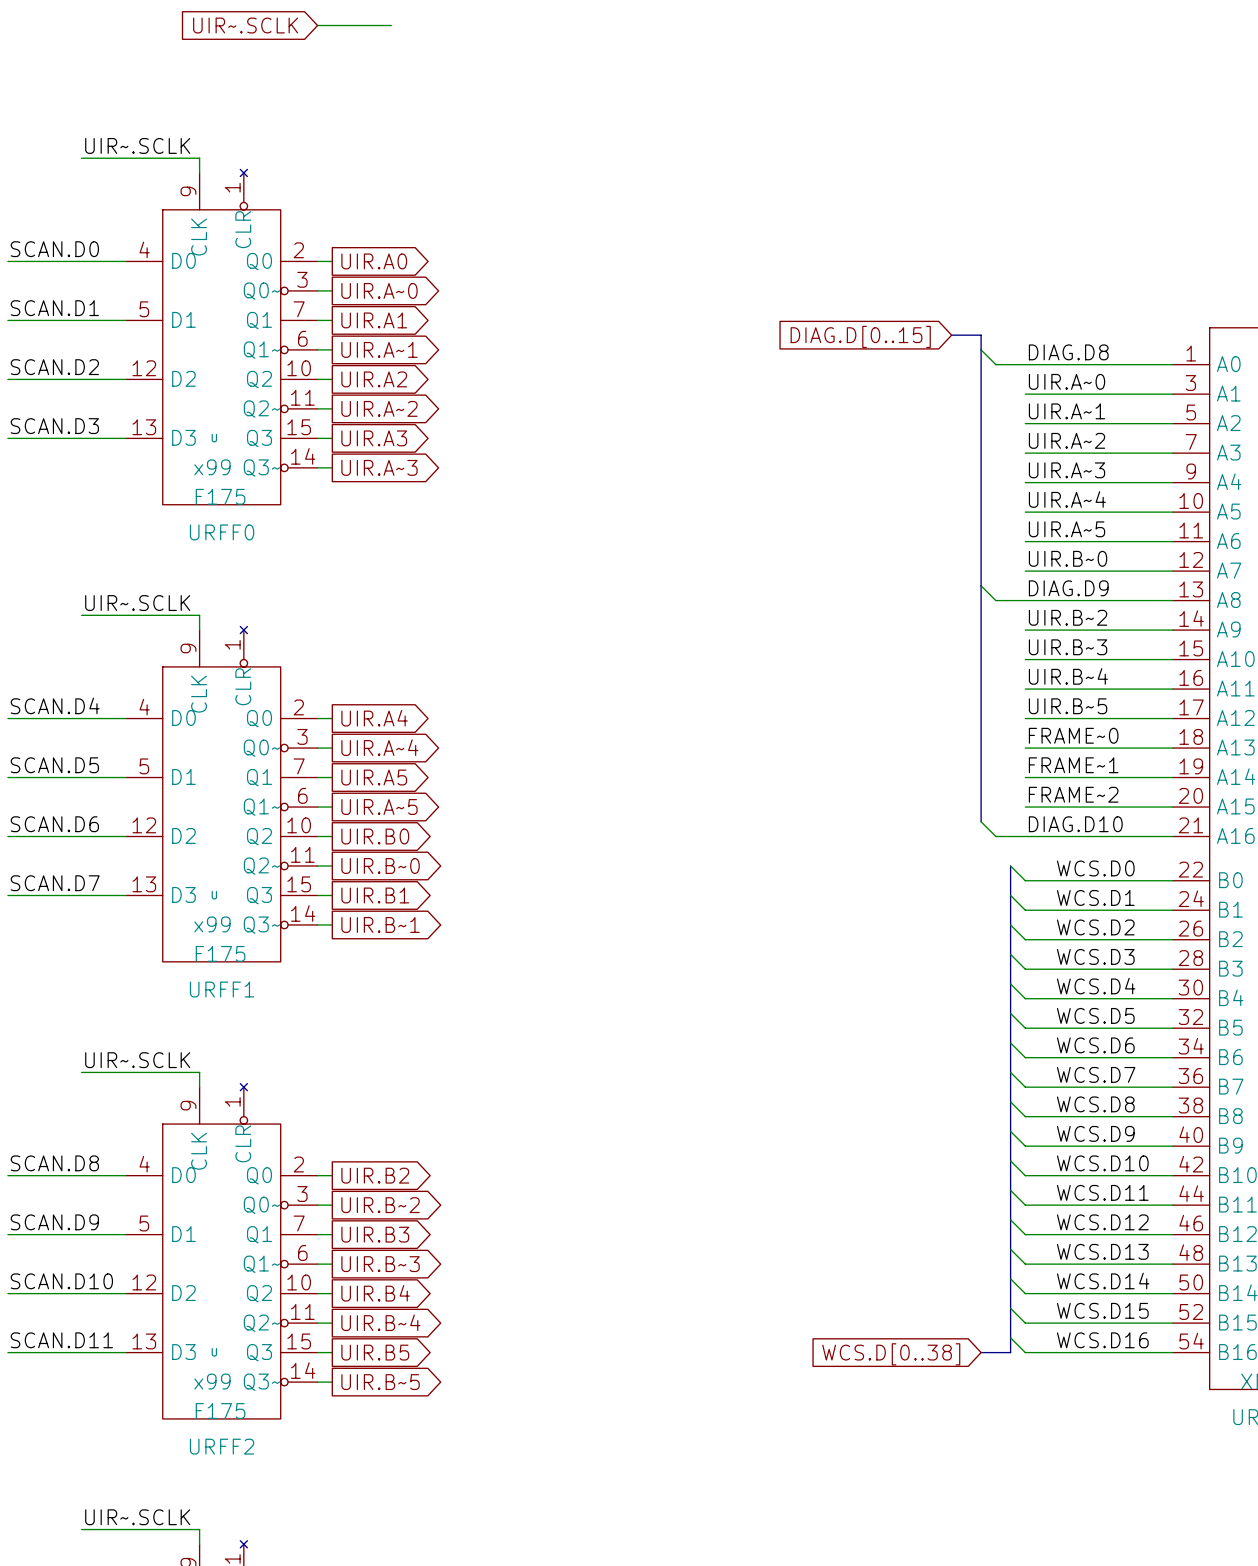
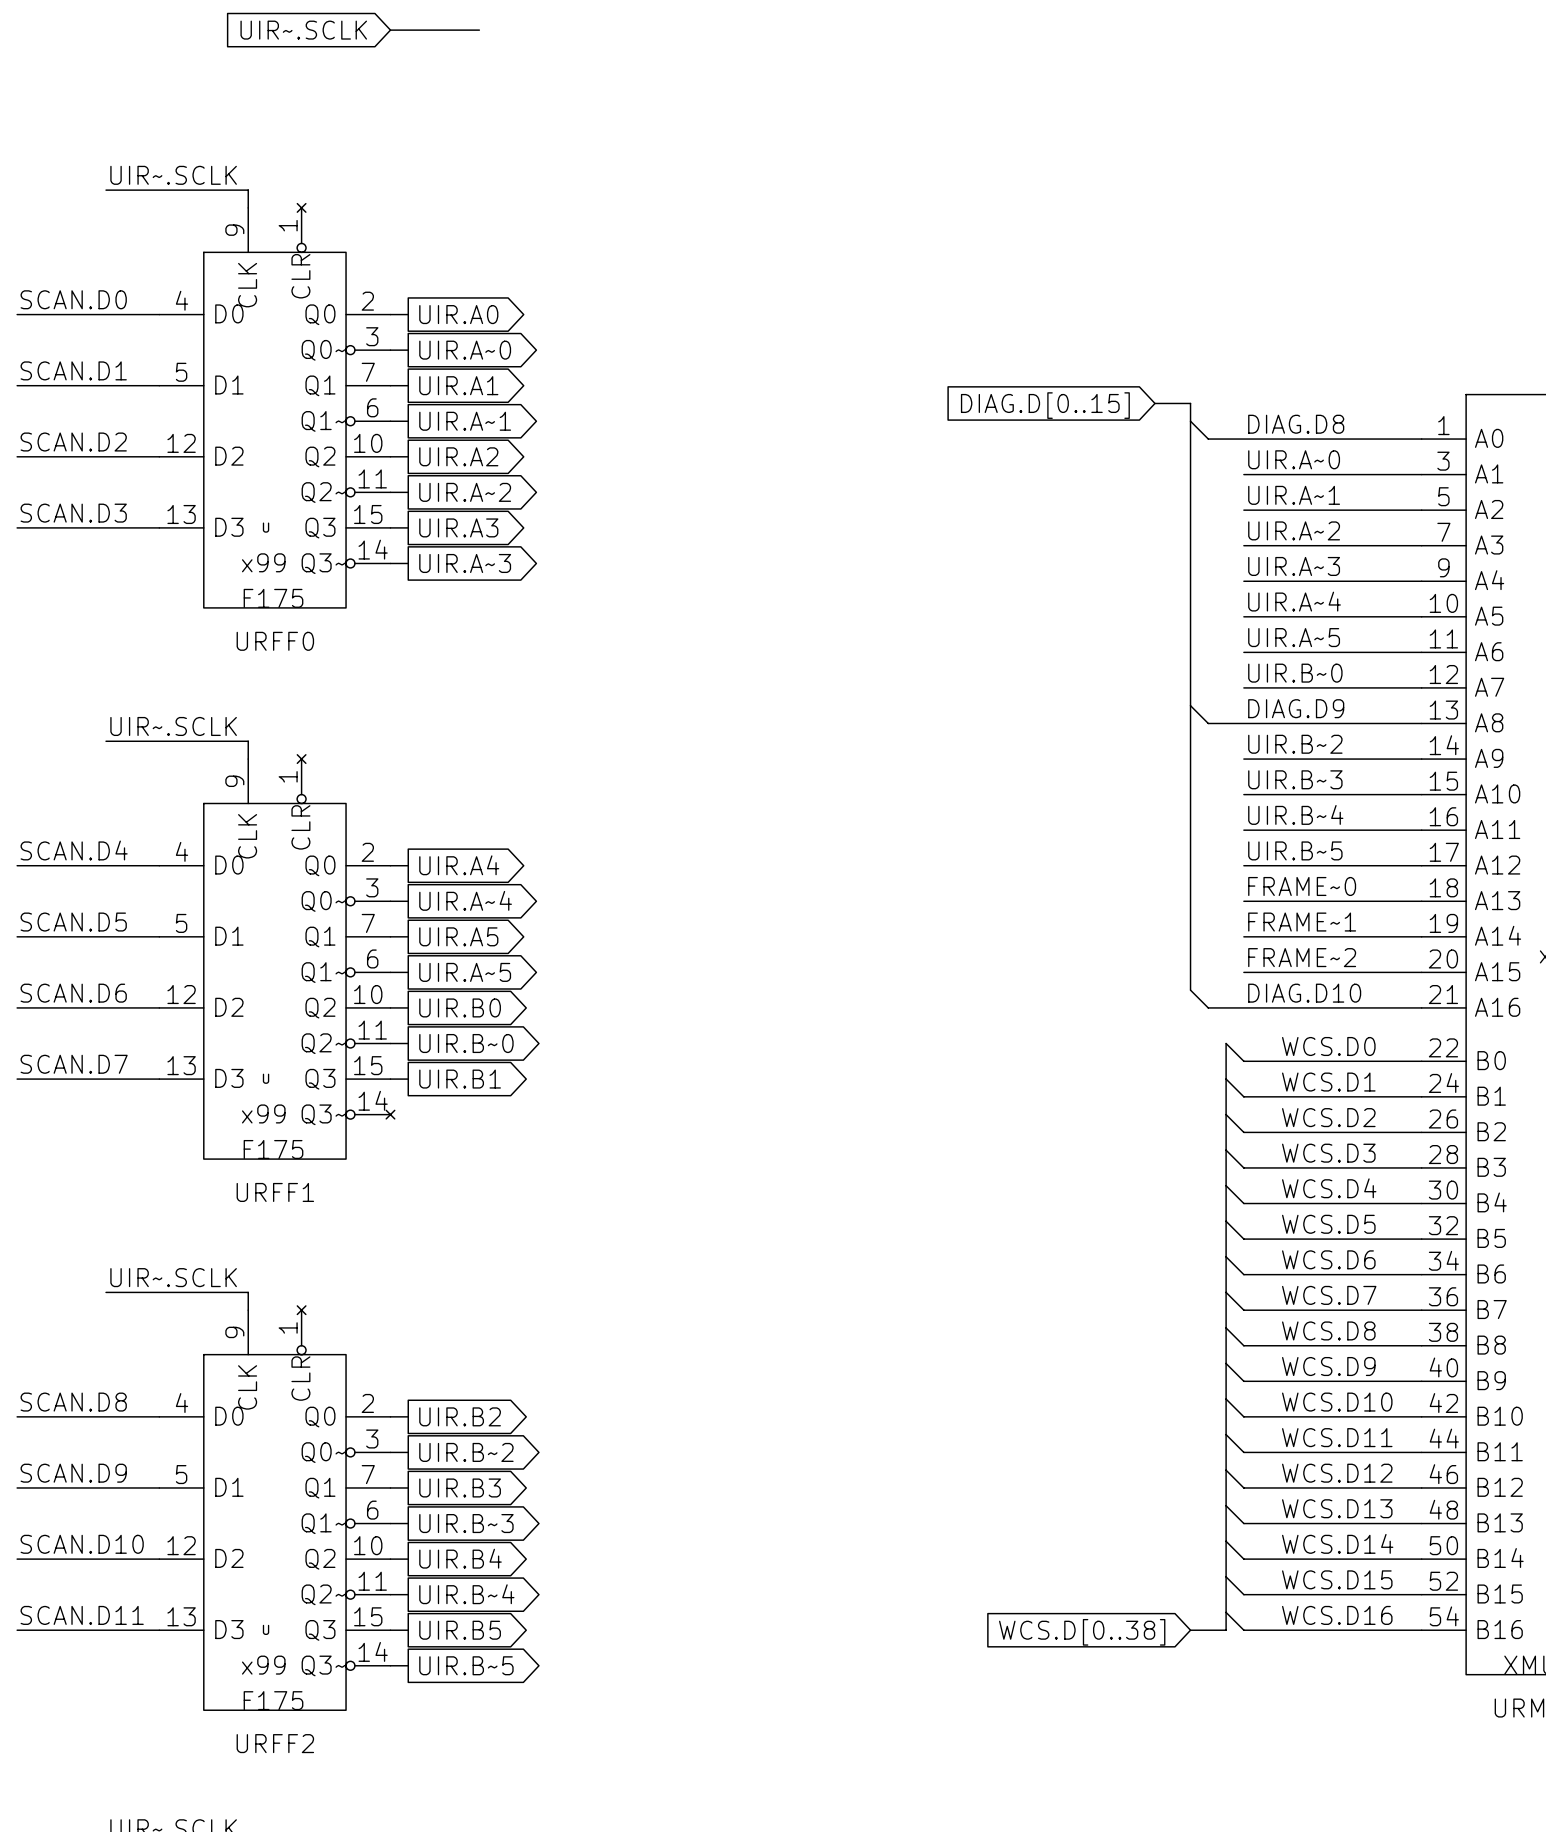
wire: (317, 924) (332, 924) -> none
no-connect mark: none -> (390, 1114)
global label: UIR.B~1 (380, 924) -> none

